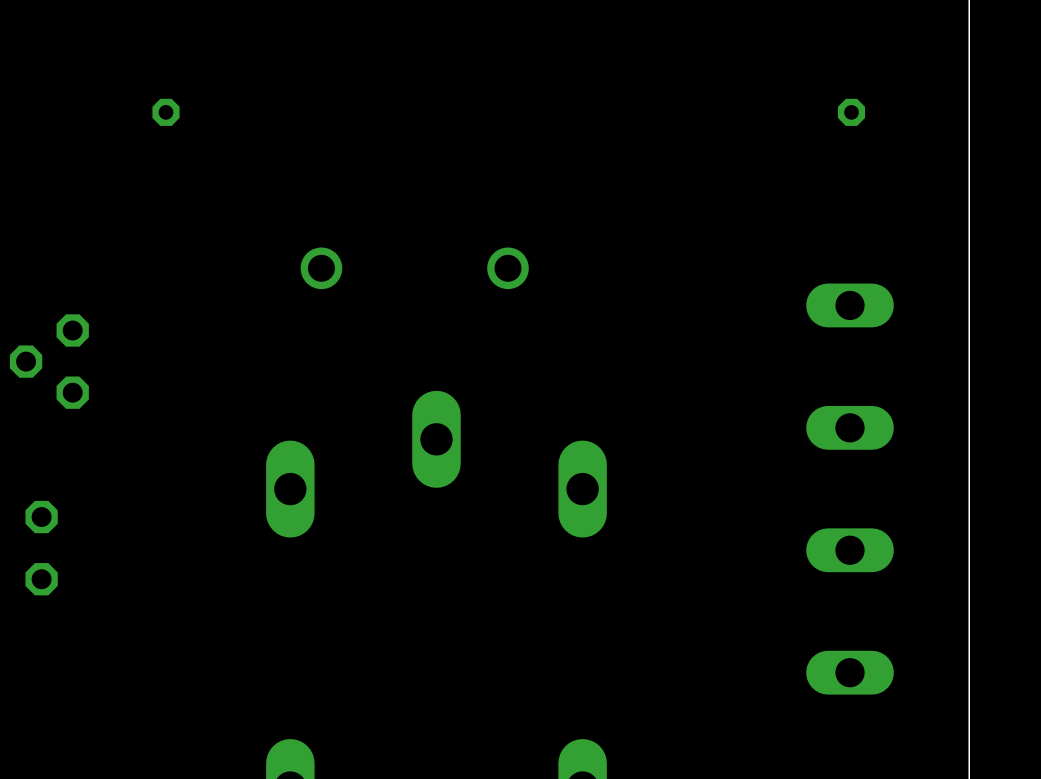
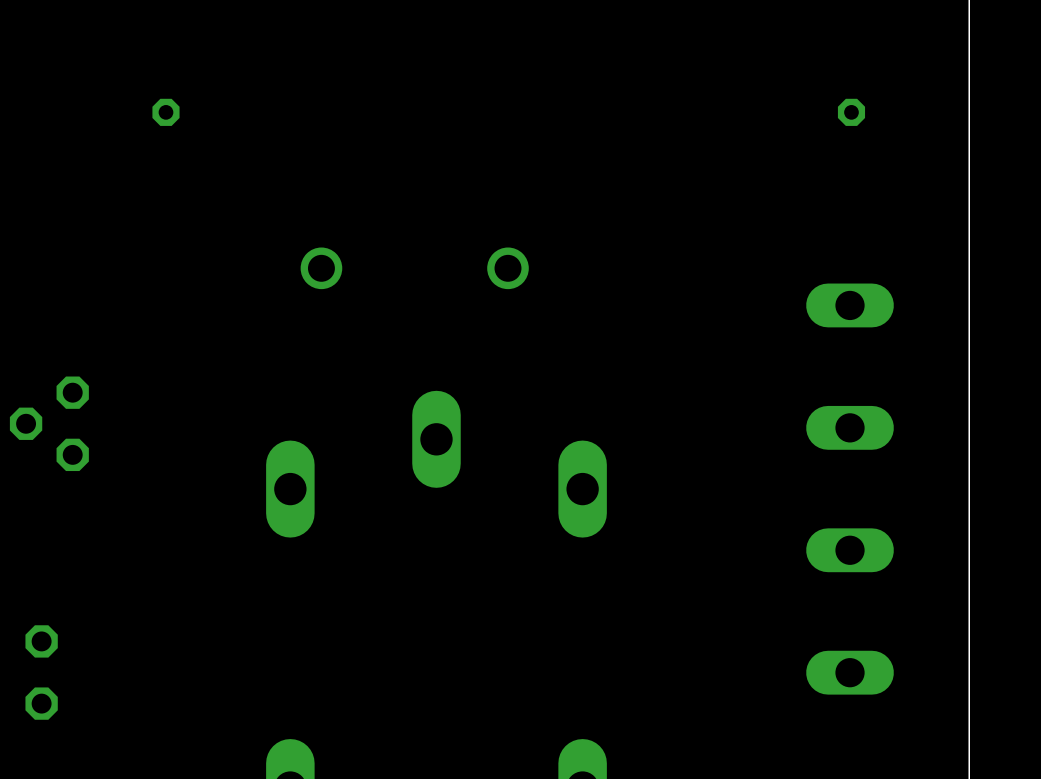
part position: (49, 361) -> (49, 423)
part position: (41, 548) -> (41, 672)

